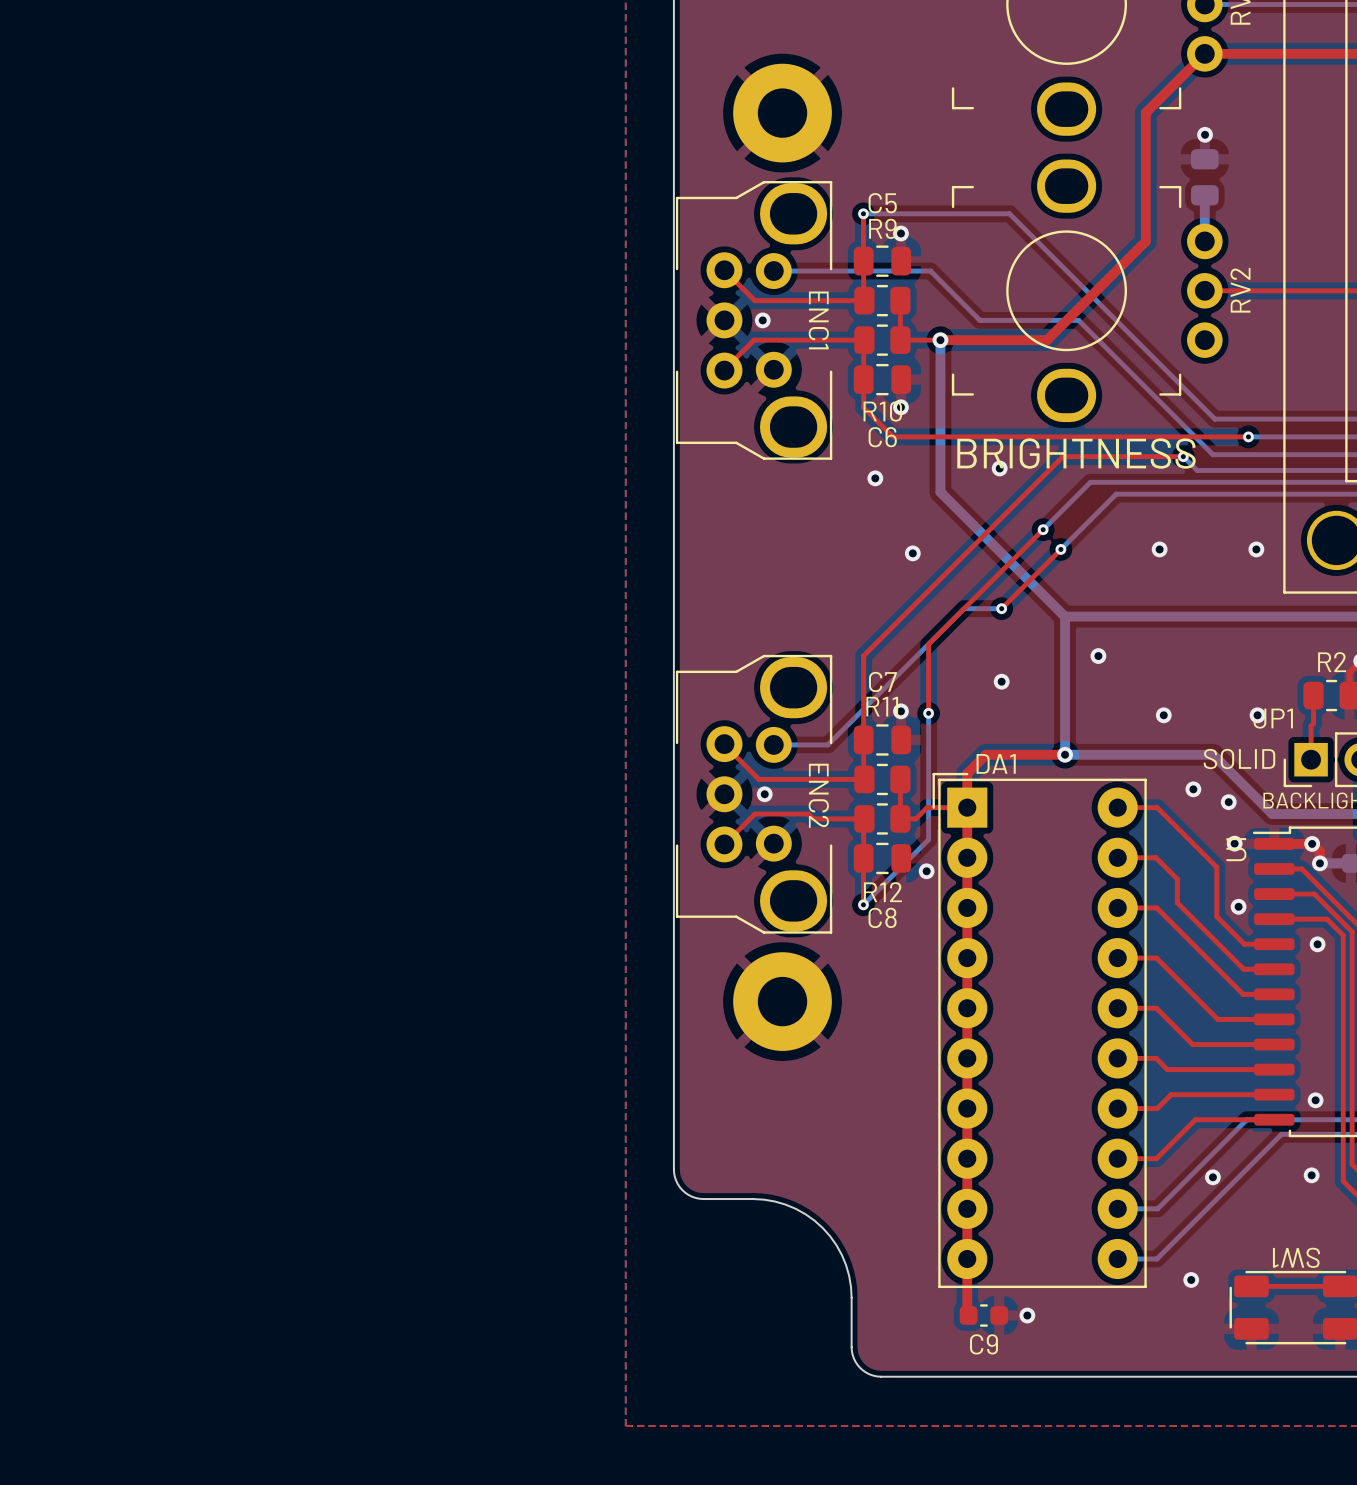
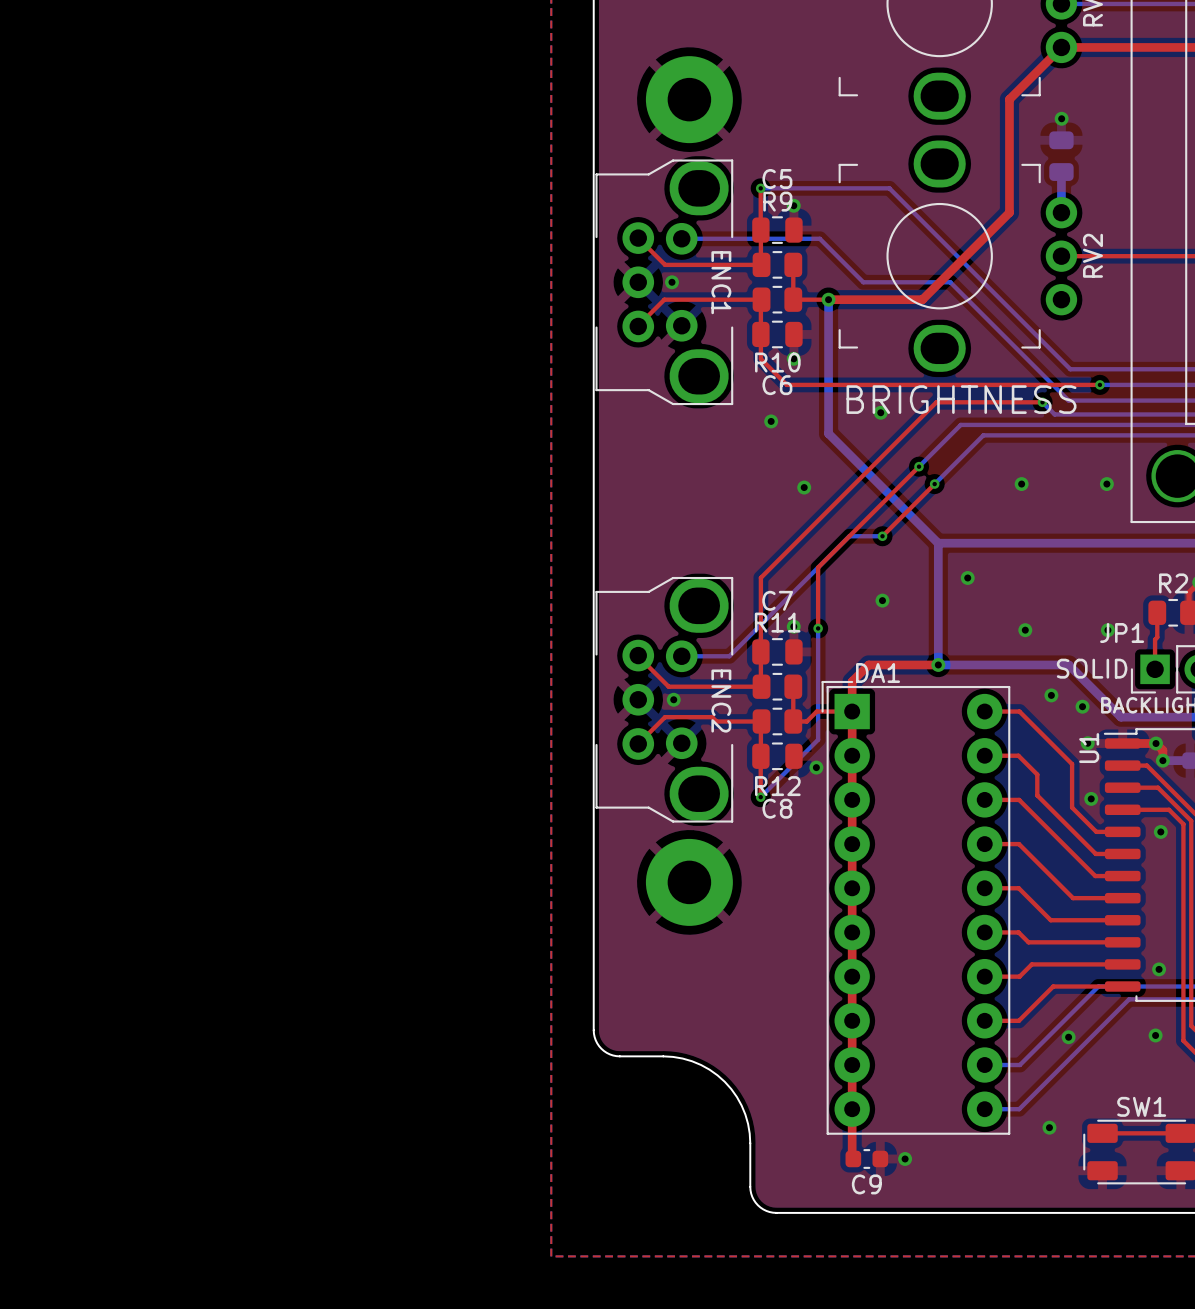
SW1 name rotation: 0° (1296, 1257) -> 180° (1141, 1106)

